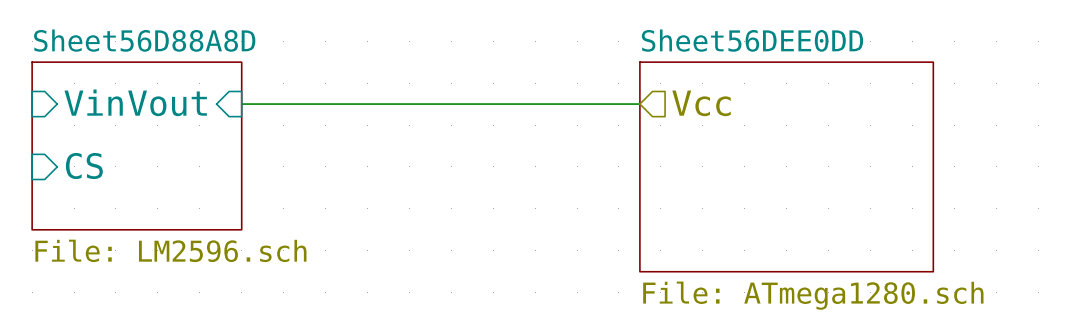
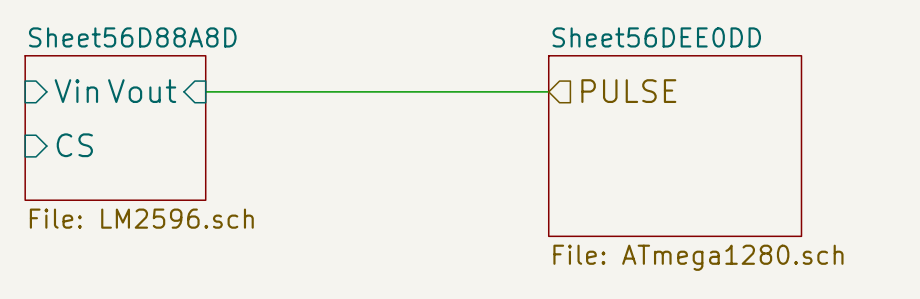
hierarchical label: Vcc (701, 103) -> PULSE (628, 91)

